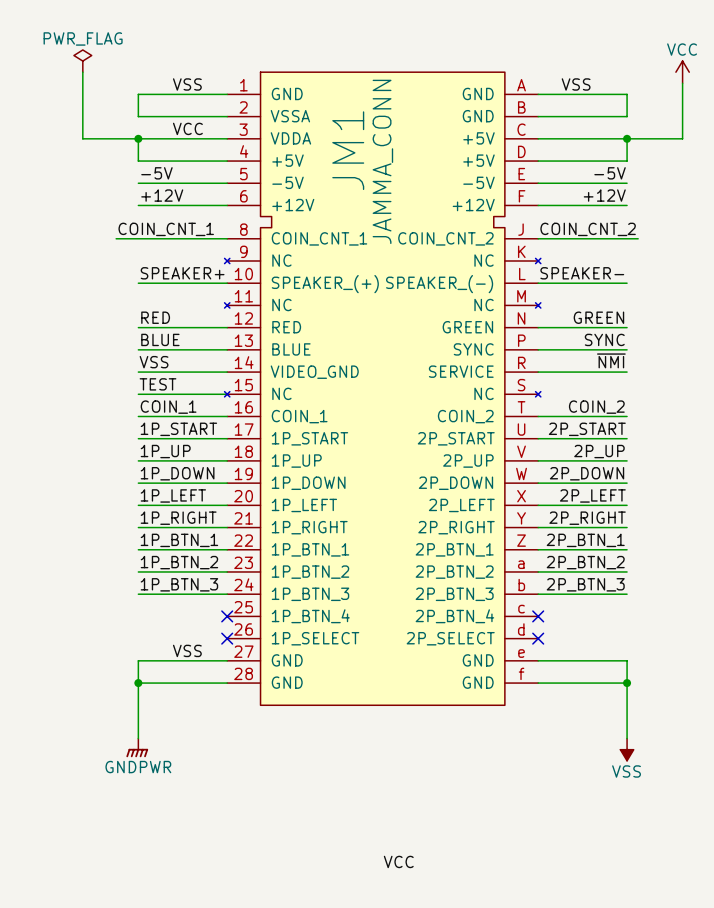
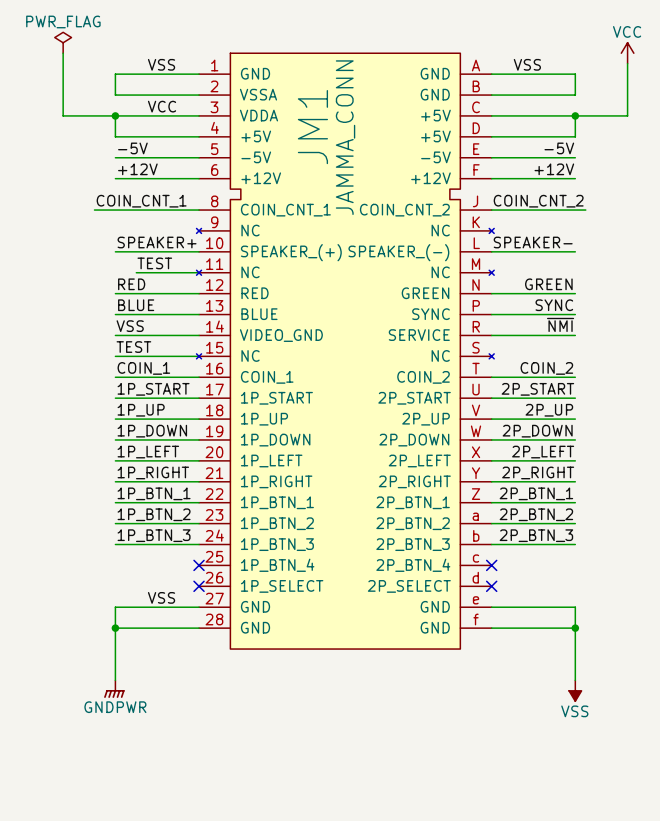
label: none -> TEST (154, 263)
wire: none -> (136, 272) (199, 272)
label: VCC (398, 861) -> none

